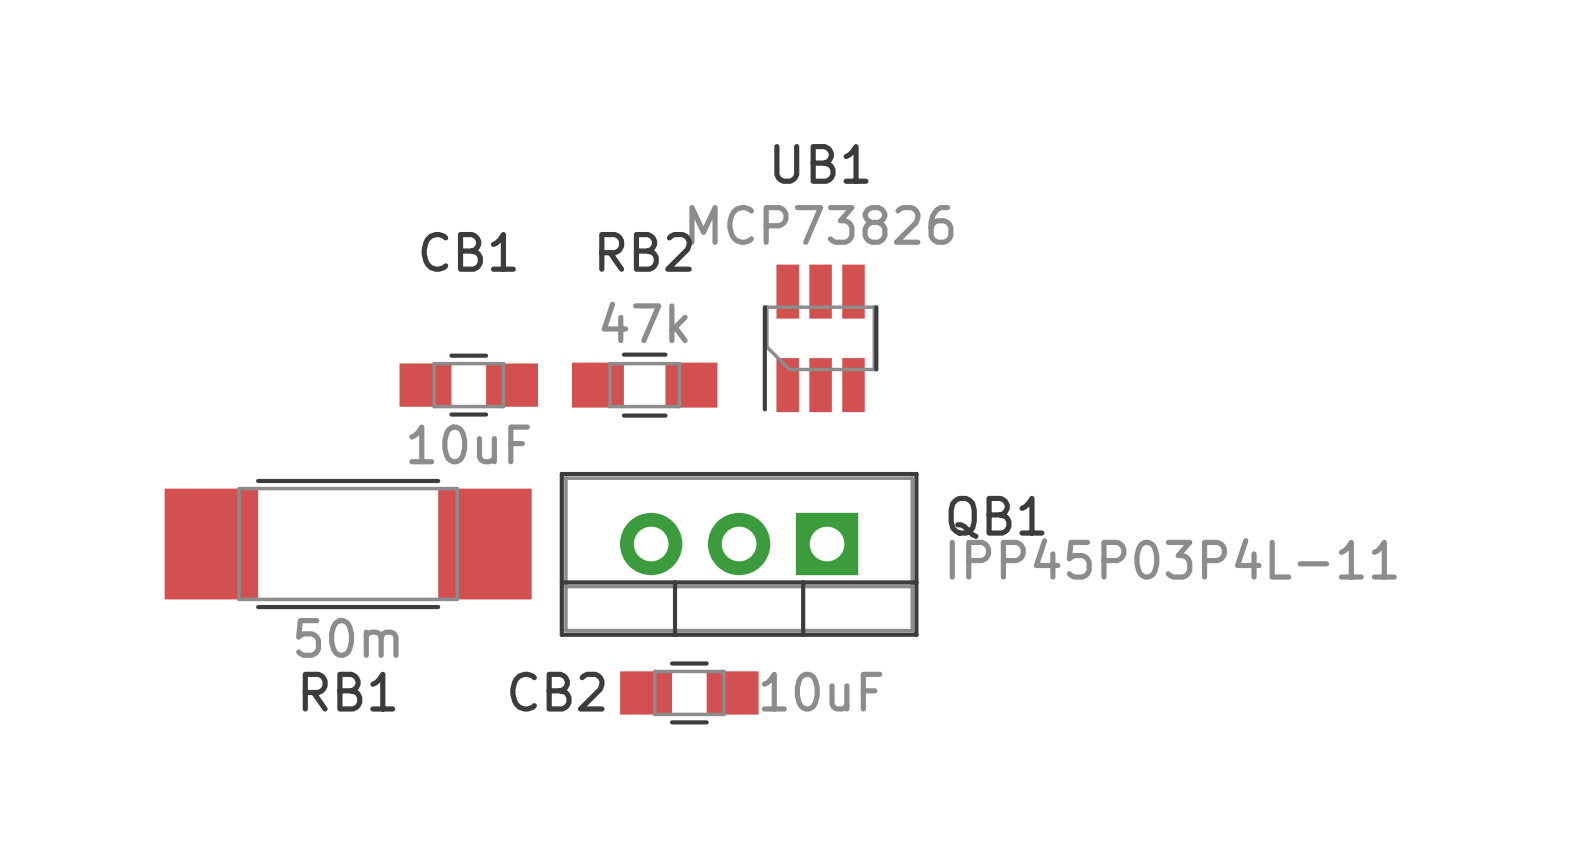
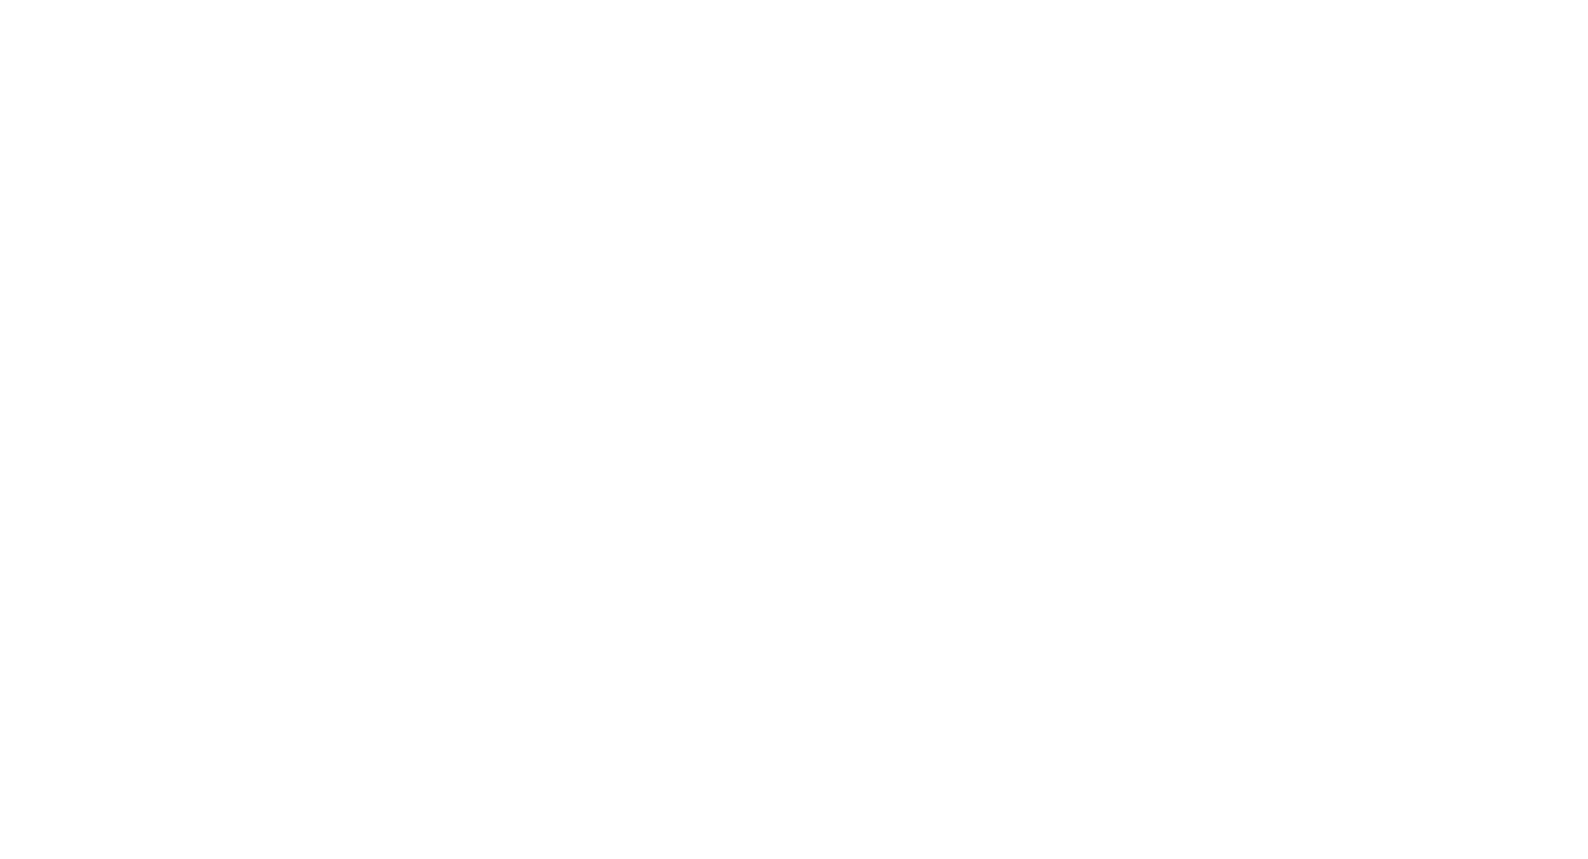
UB1: MCP73826 (820, 338) -> none
CB1: 10uF (468, 385) -> none
RB2: 47k (644, 385) -> none
RB1: 50m (348, 544) -> none
QB1: IPP45P03P4L-11 (739, 554) -> none
CB2: 10uF (689, 692) -> none

